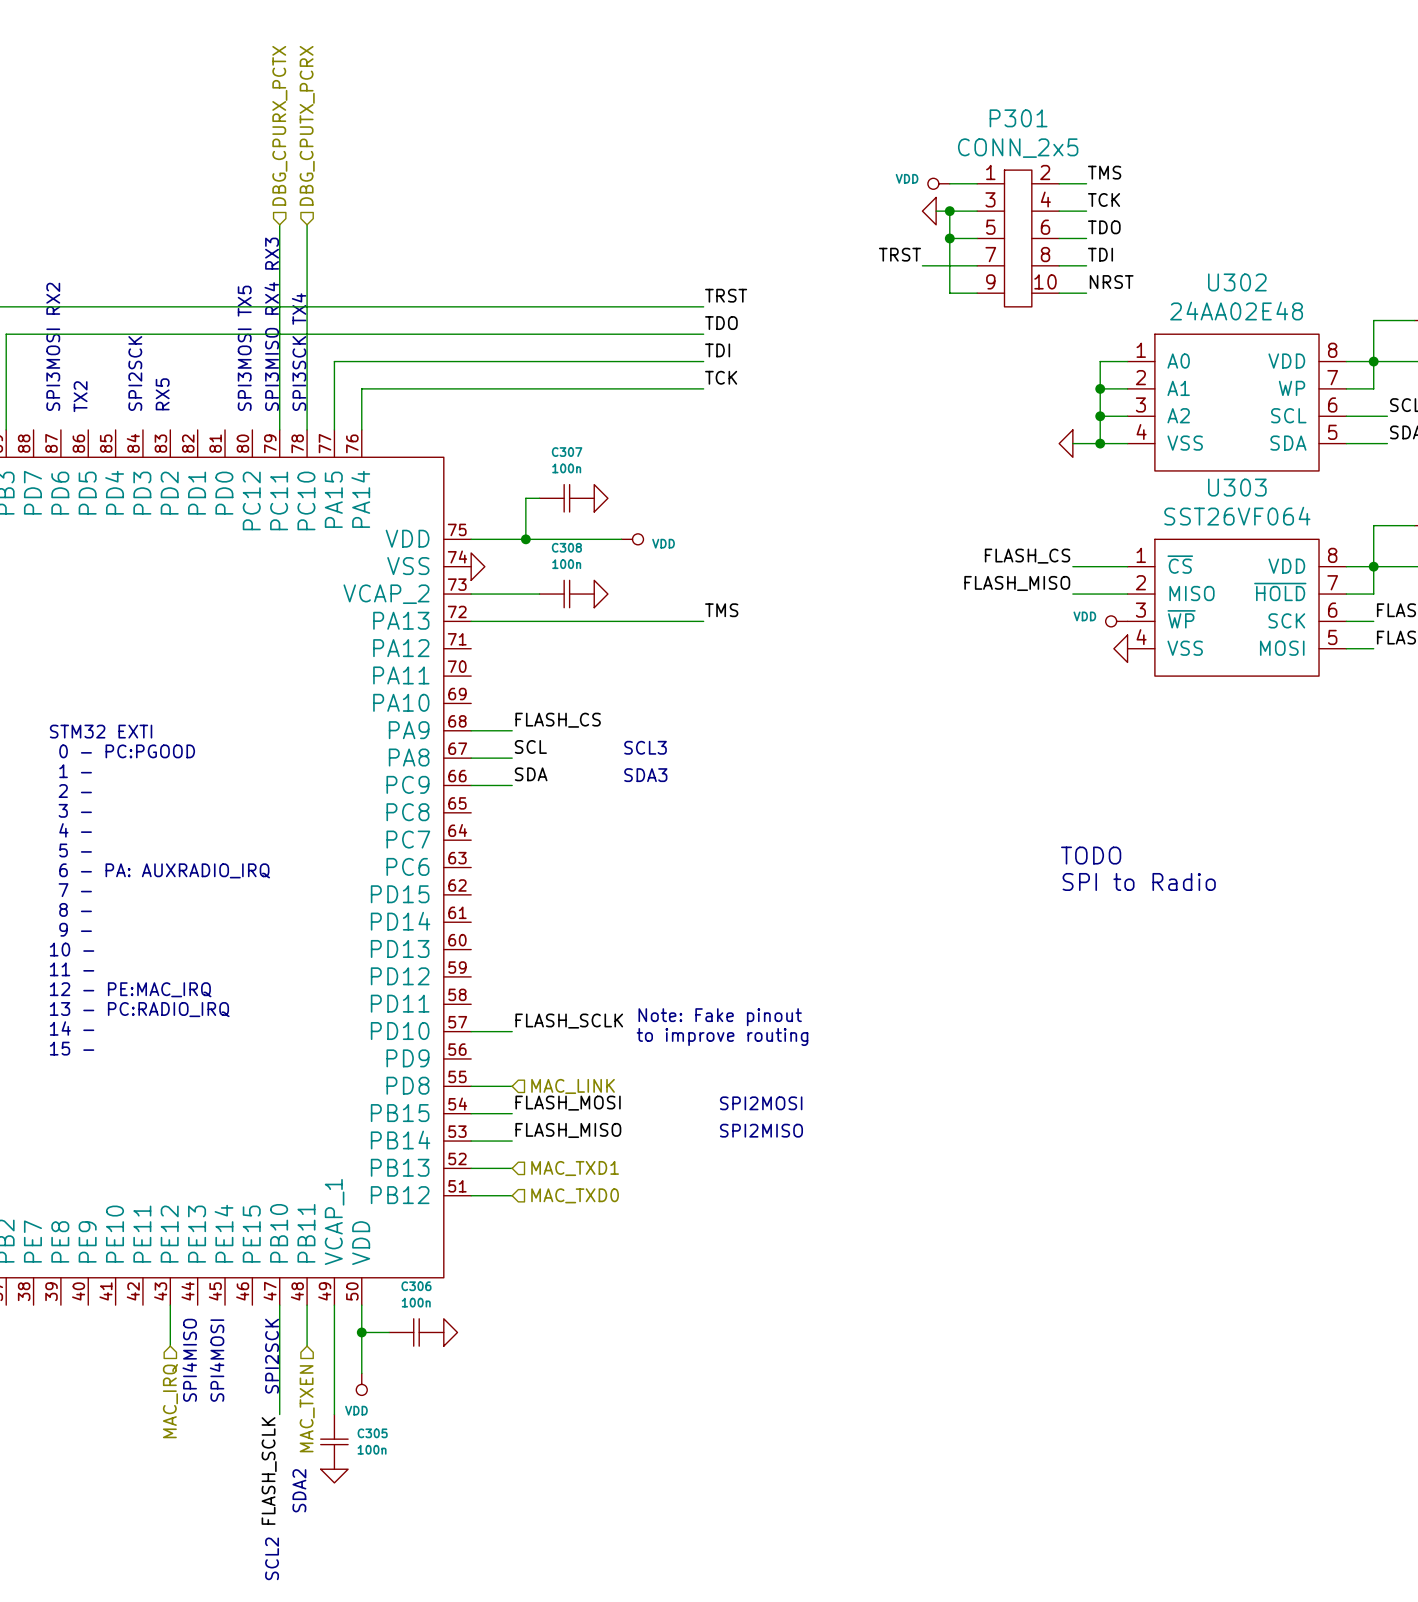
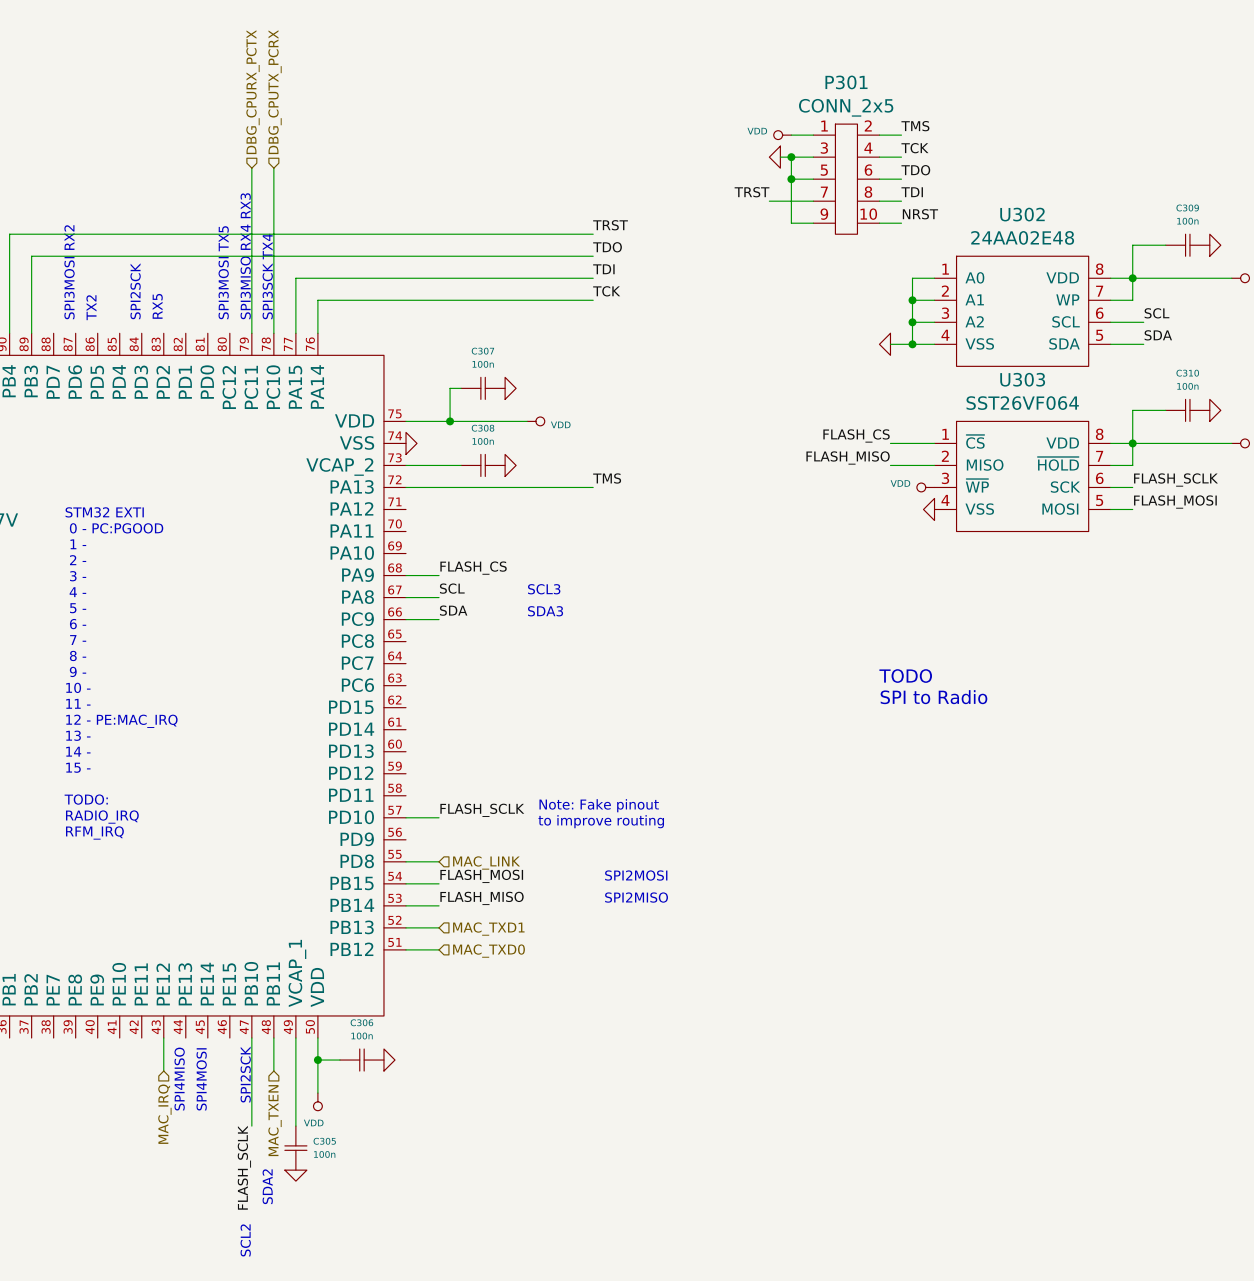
text: none -> STM32 EXTI (104, 512)
text: none -> 0 - PC:PGOOD (116, 528)
text: none -> 1 - (78, 544)
text: none -> 2 - (78, 560)
text: STM32 EXTI (101, 731) -> 3 - (78, 576)
text: 0 - PC:PGOOD (127, 751) -> 4 - (77, 592)
text: 1 - (75, 771) -> 5 - (78, 608)
text: 2 - (75, 791) -> 6 - (78, 624)
text: 3 - (75, 810) -> 7 - (78, 640)
text: 4 - (75, 830) -> 8 - (78, 655)
text: 5 - (75, 850) -> 9 - (78, 671)
text: 6 - PA: AUXRADIO_IRQ (164, 870) -> 10 - (78, 687)
text: 7 - (75, 890) -> 11 - (78, 703)
text: 8 - (75, 909) -> 12 - PE:MAC_IRQ (121, 721)
text: 9 - (75, 929) -> 13 - (78, 735)
text: 10 - (72, 949) -> 14 - (78, 751)
text: 11 - (72, 969) -> 15 - (78, 767)
text: 12 - PE:MAC_IRQ (130, 989) -> none
text: 13 - PC:RADIO_IRQ (139, 1009) -> TODO: (86, 799)
text: 14 - (72, 1028) -> RADIO_IRQ (102, 817)
text: 15 - (72, 1048) -> RFM_IRQ (94, 832)

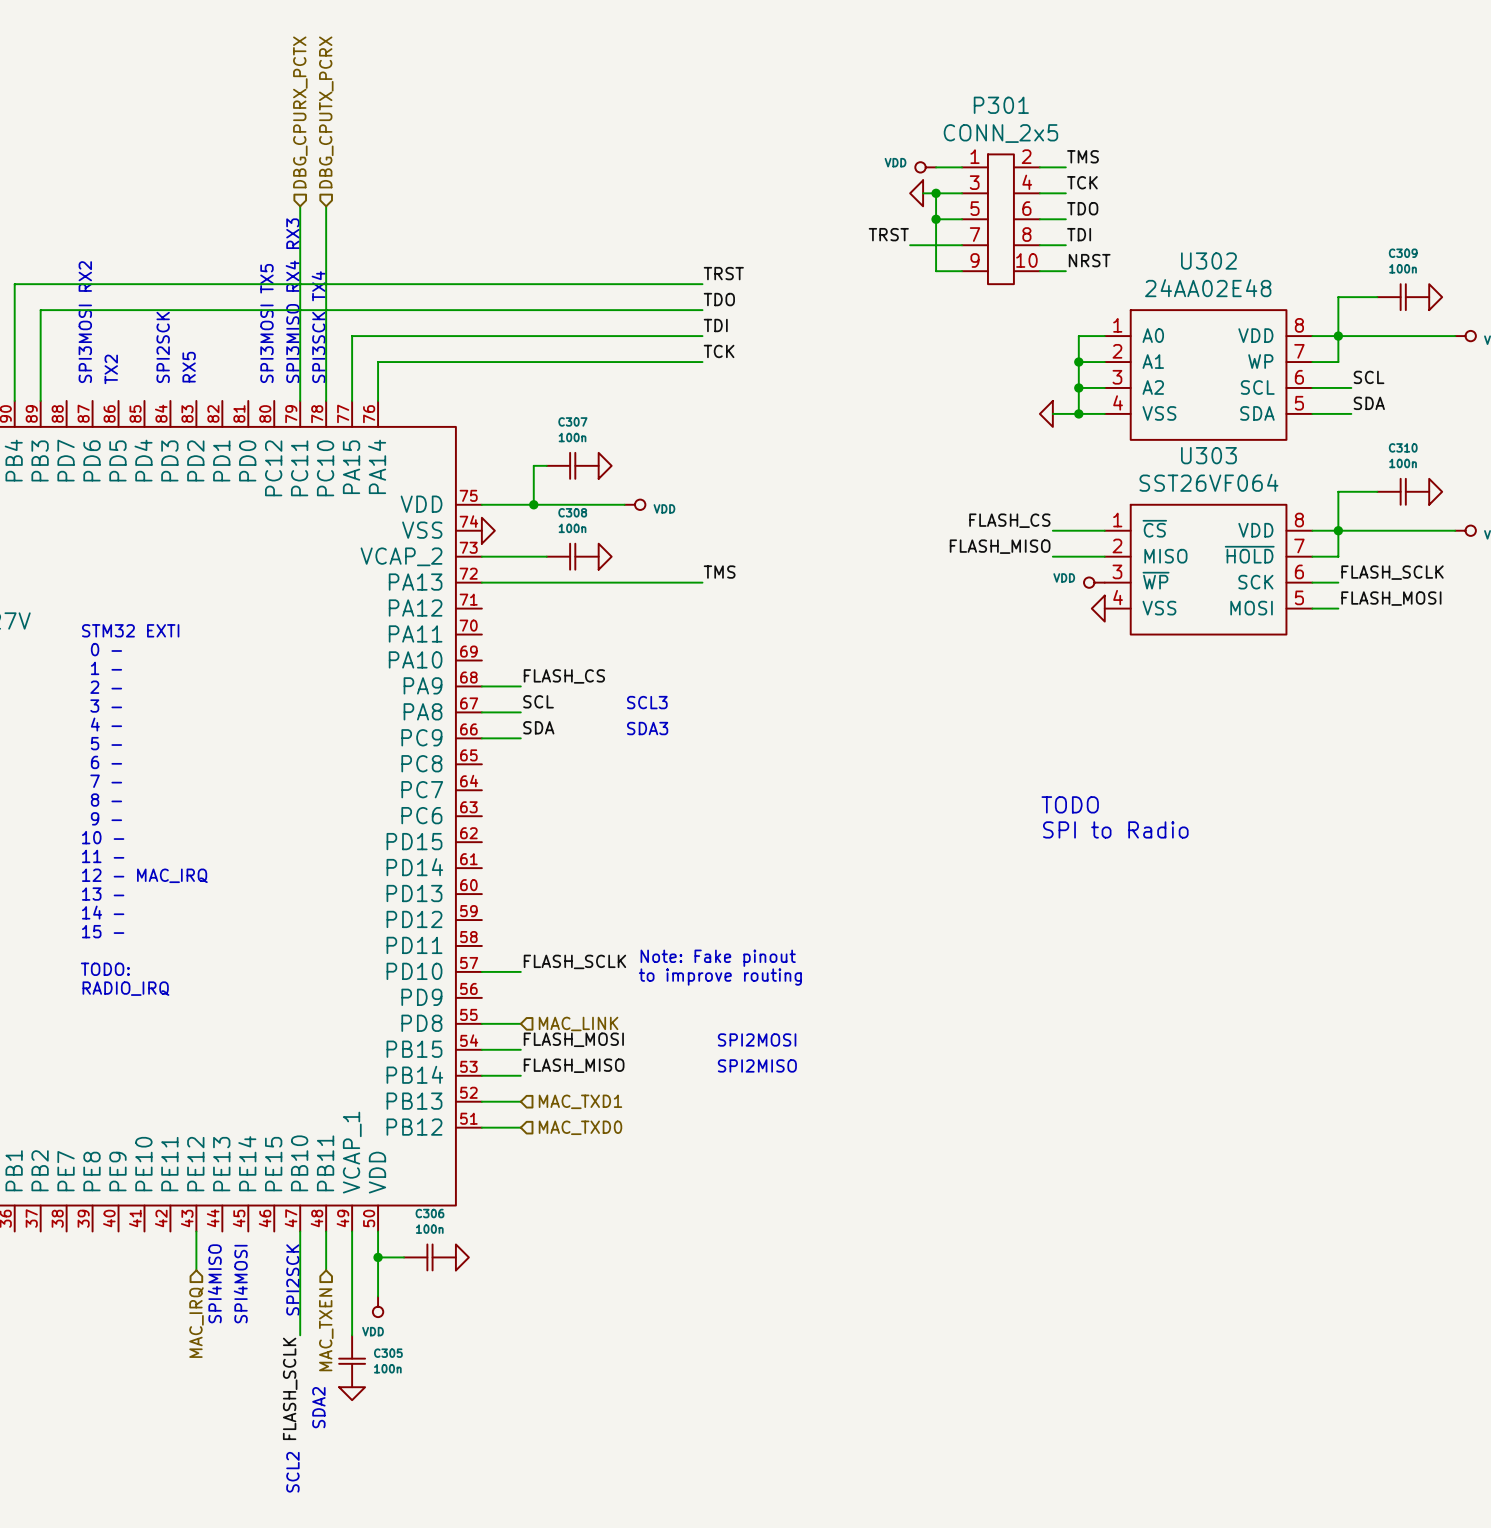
text: STM32 EXTI (104, 512) -> none
text: 0 - PC:PGOOD (116, 528) -> STM32 EXTI (130, 630)
text: 1 - (78, 544) -> 0 - (106, 649)
text: 2 - (78, 560) -> 1 - (106, 668)
text: 3 - (78, 576) -> 2 - (106, 687)
text: 4 - (77, 592) -> 3 - (106, 706)
text: 5 - (78, 608) -> 4 - (106, 724)
text: 6 - (78, 624) -> 5 - (106, 743)
text: 7 - (78, 640) -> 6 - (106, 762)
text: 8 - (78, 655) -> 7 - (106, 781)
text: 9 - (78, 671) -> 8 - (106, 800)
text: 10 - (78, 687) -> 9 - (106, 818)
text: 11 - (78, 703) -> 10 - (103, 837)
text: 12 - PE:MAC_IRQ (121, 721) -> 11 - (103, 856)
text: 13 - (78, 735) -> 12 - MAC_IRQ (144, 875)
text: 14 - (78, 751) -> 13 - (103, 894)
text: 15 - (78, 767) -> 14 - (103, 912)
text: none -> 15 - (103, 931)
text: TODO: (86, 799) -> none
text: RADIO_IRQ (102, 817) -> TODO: (105, 969)
text: RFM_IRQ (94, 832) -> RADIO_IRQ (125, 988)

